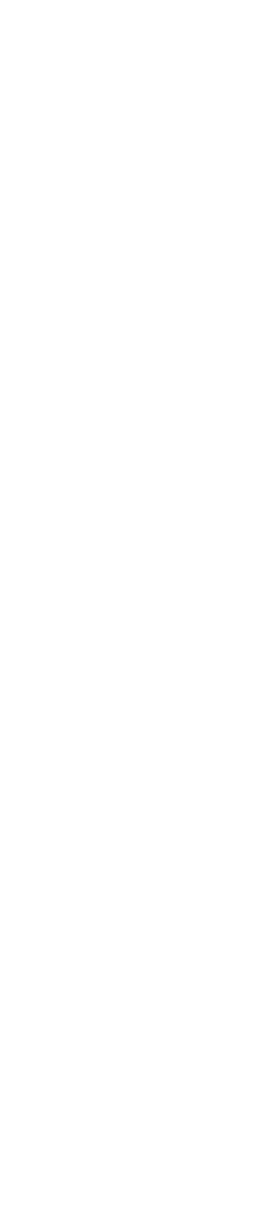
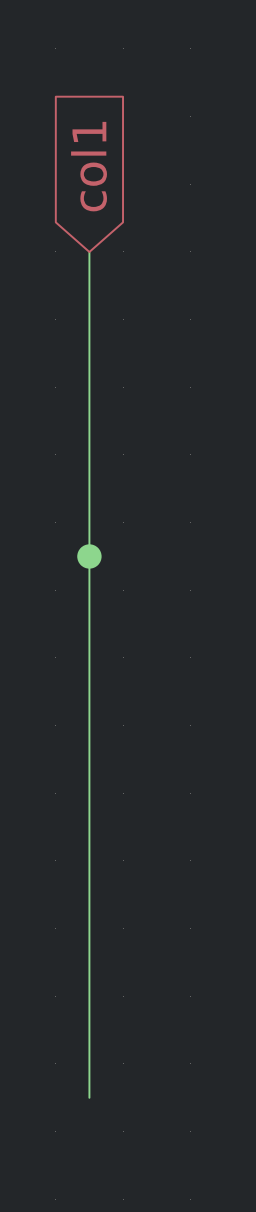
global label: none -> col1 (89, 166)
wire: none -> (89, 251) (89, 1097)
junction: none -> (89, 556)

